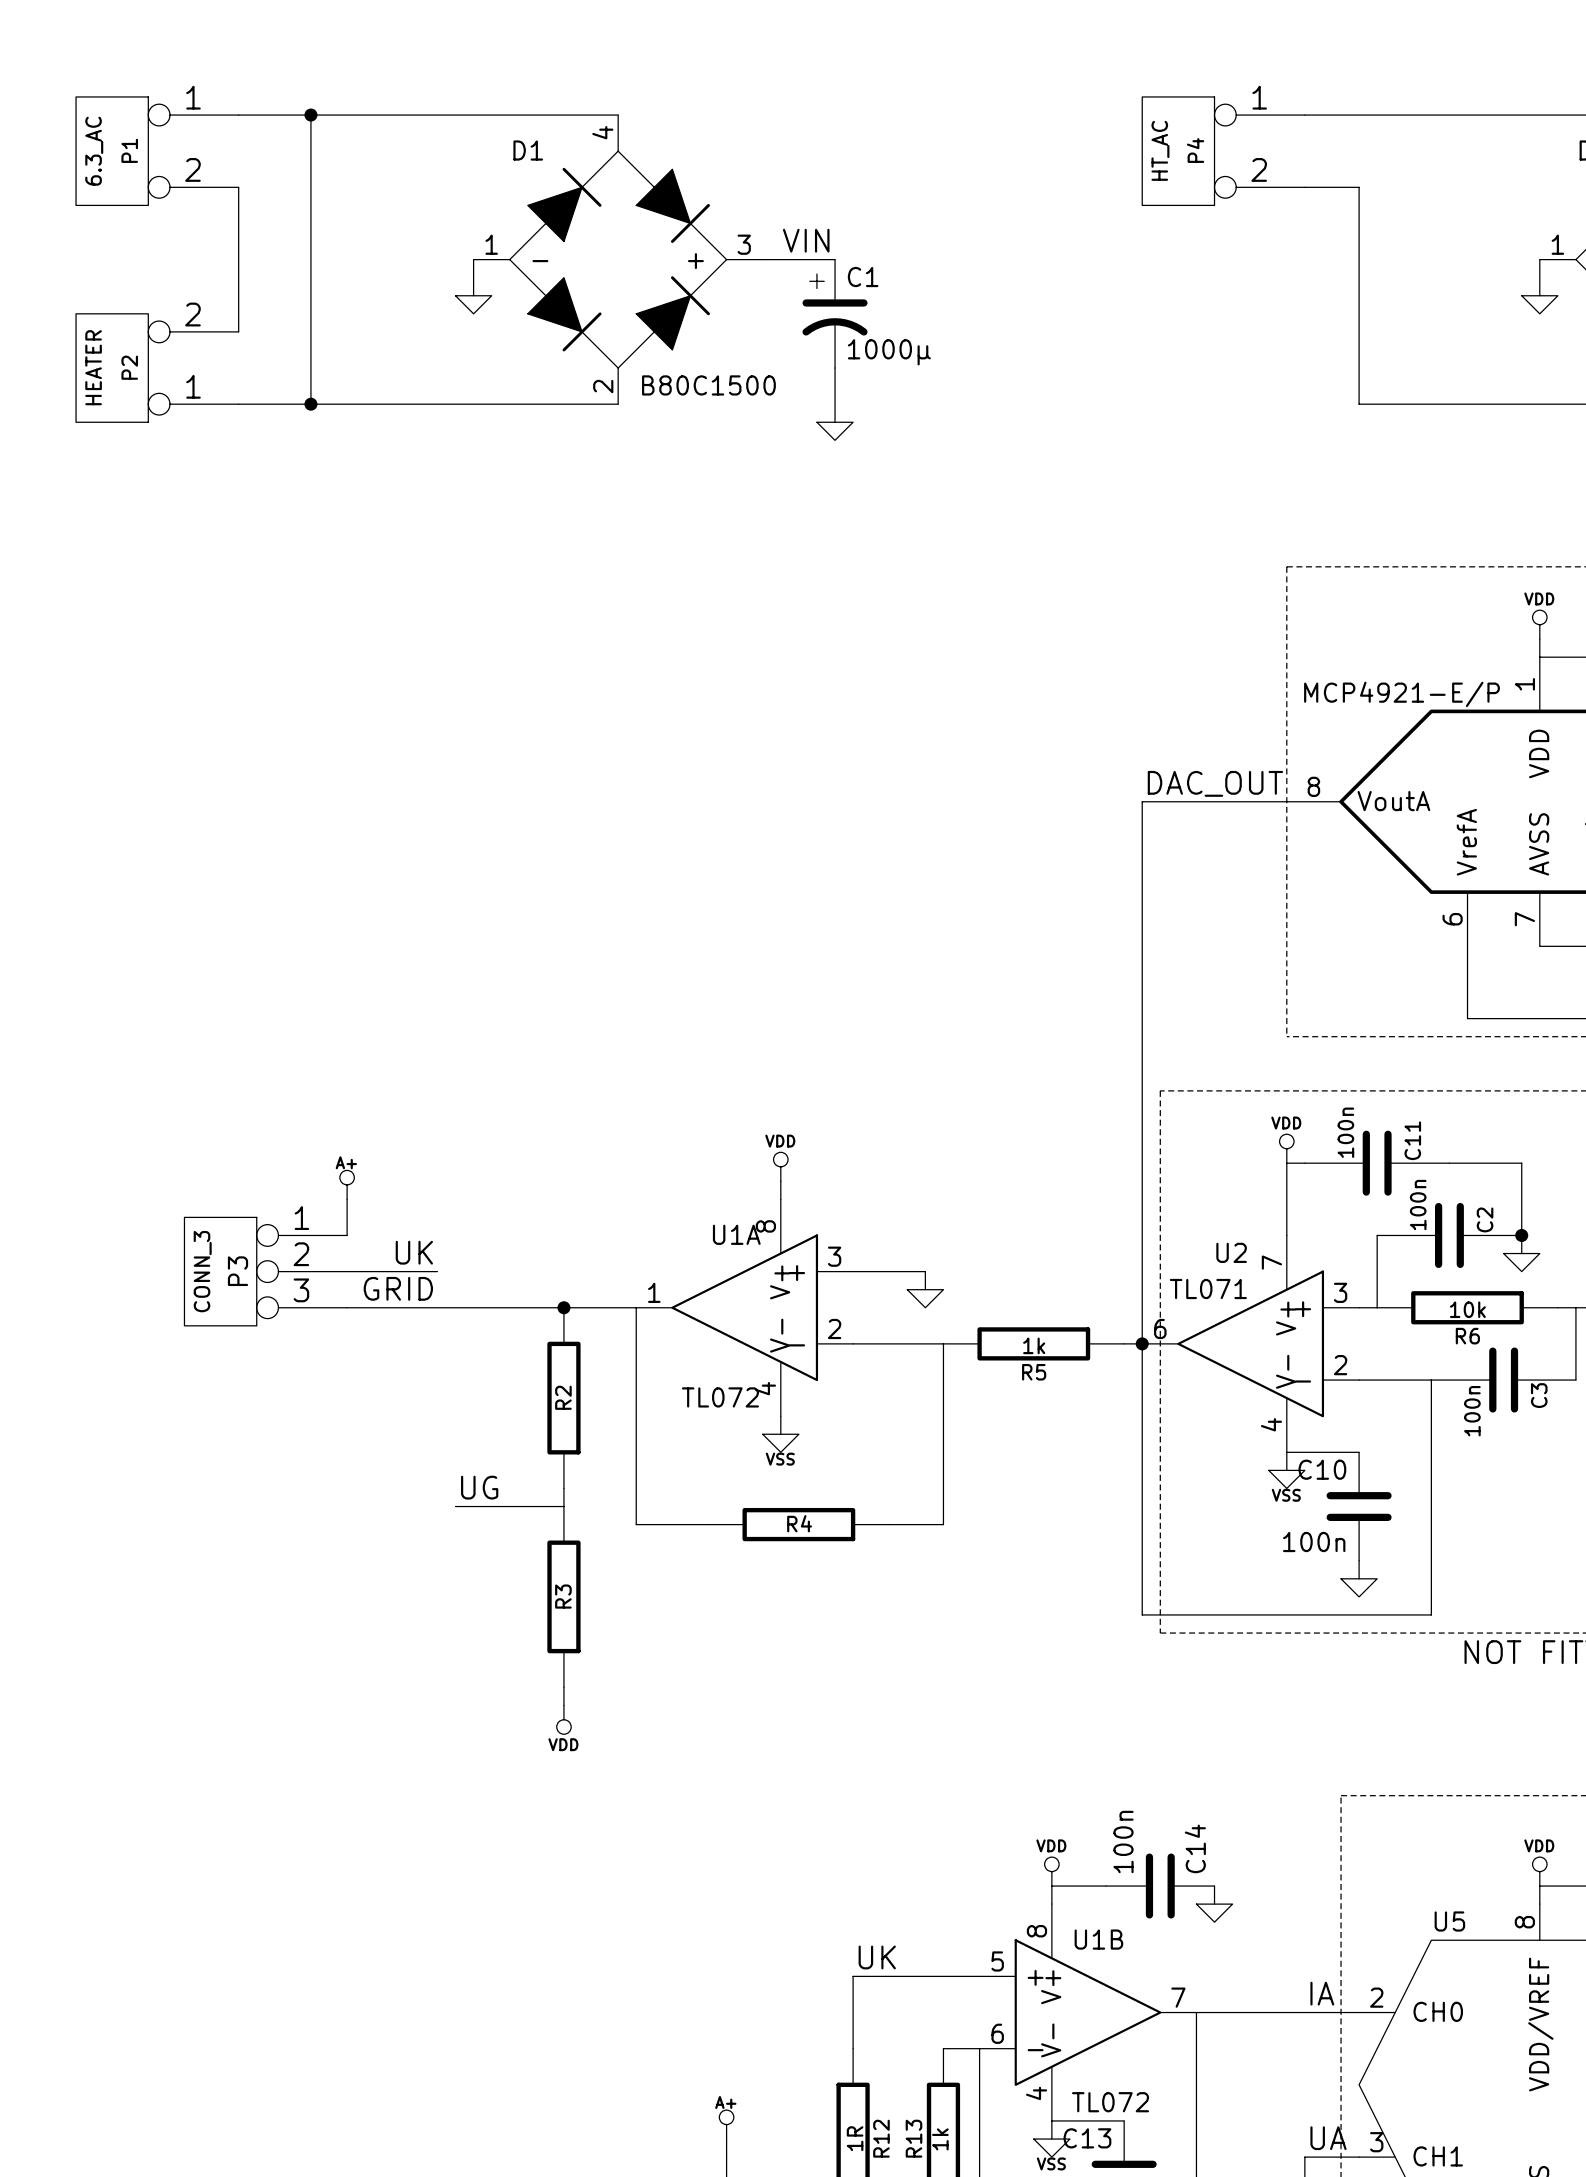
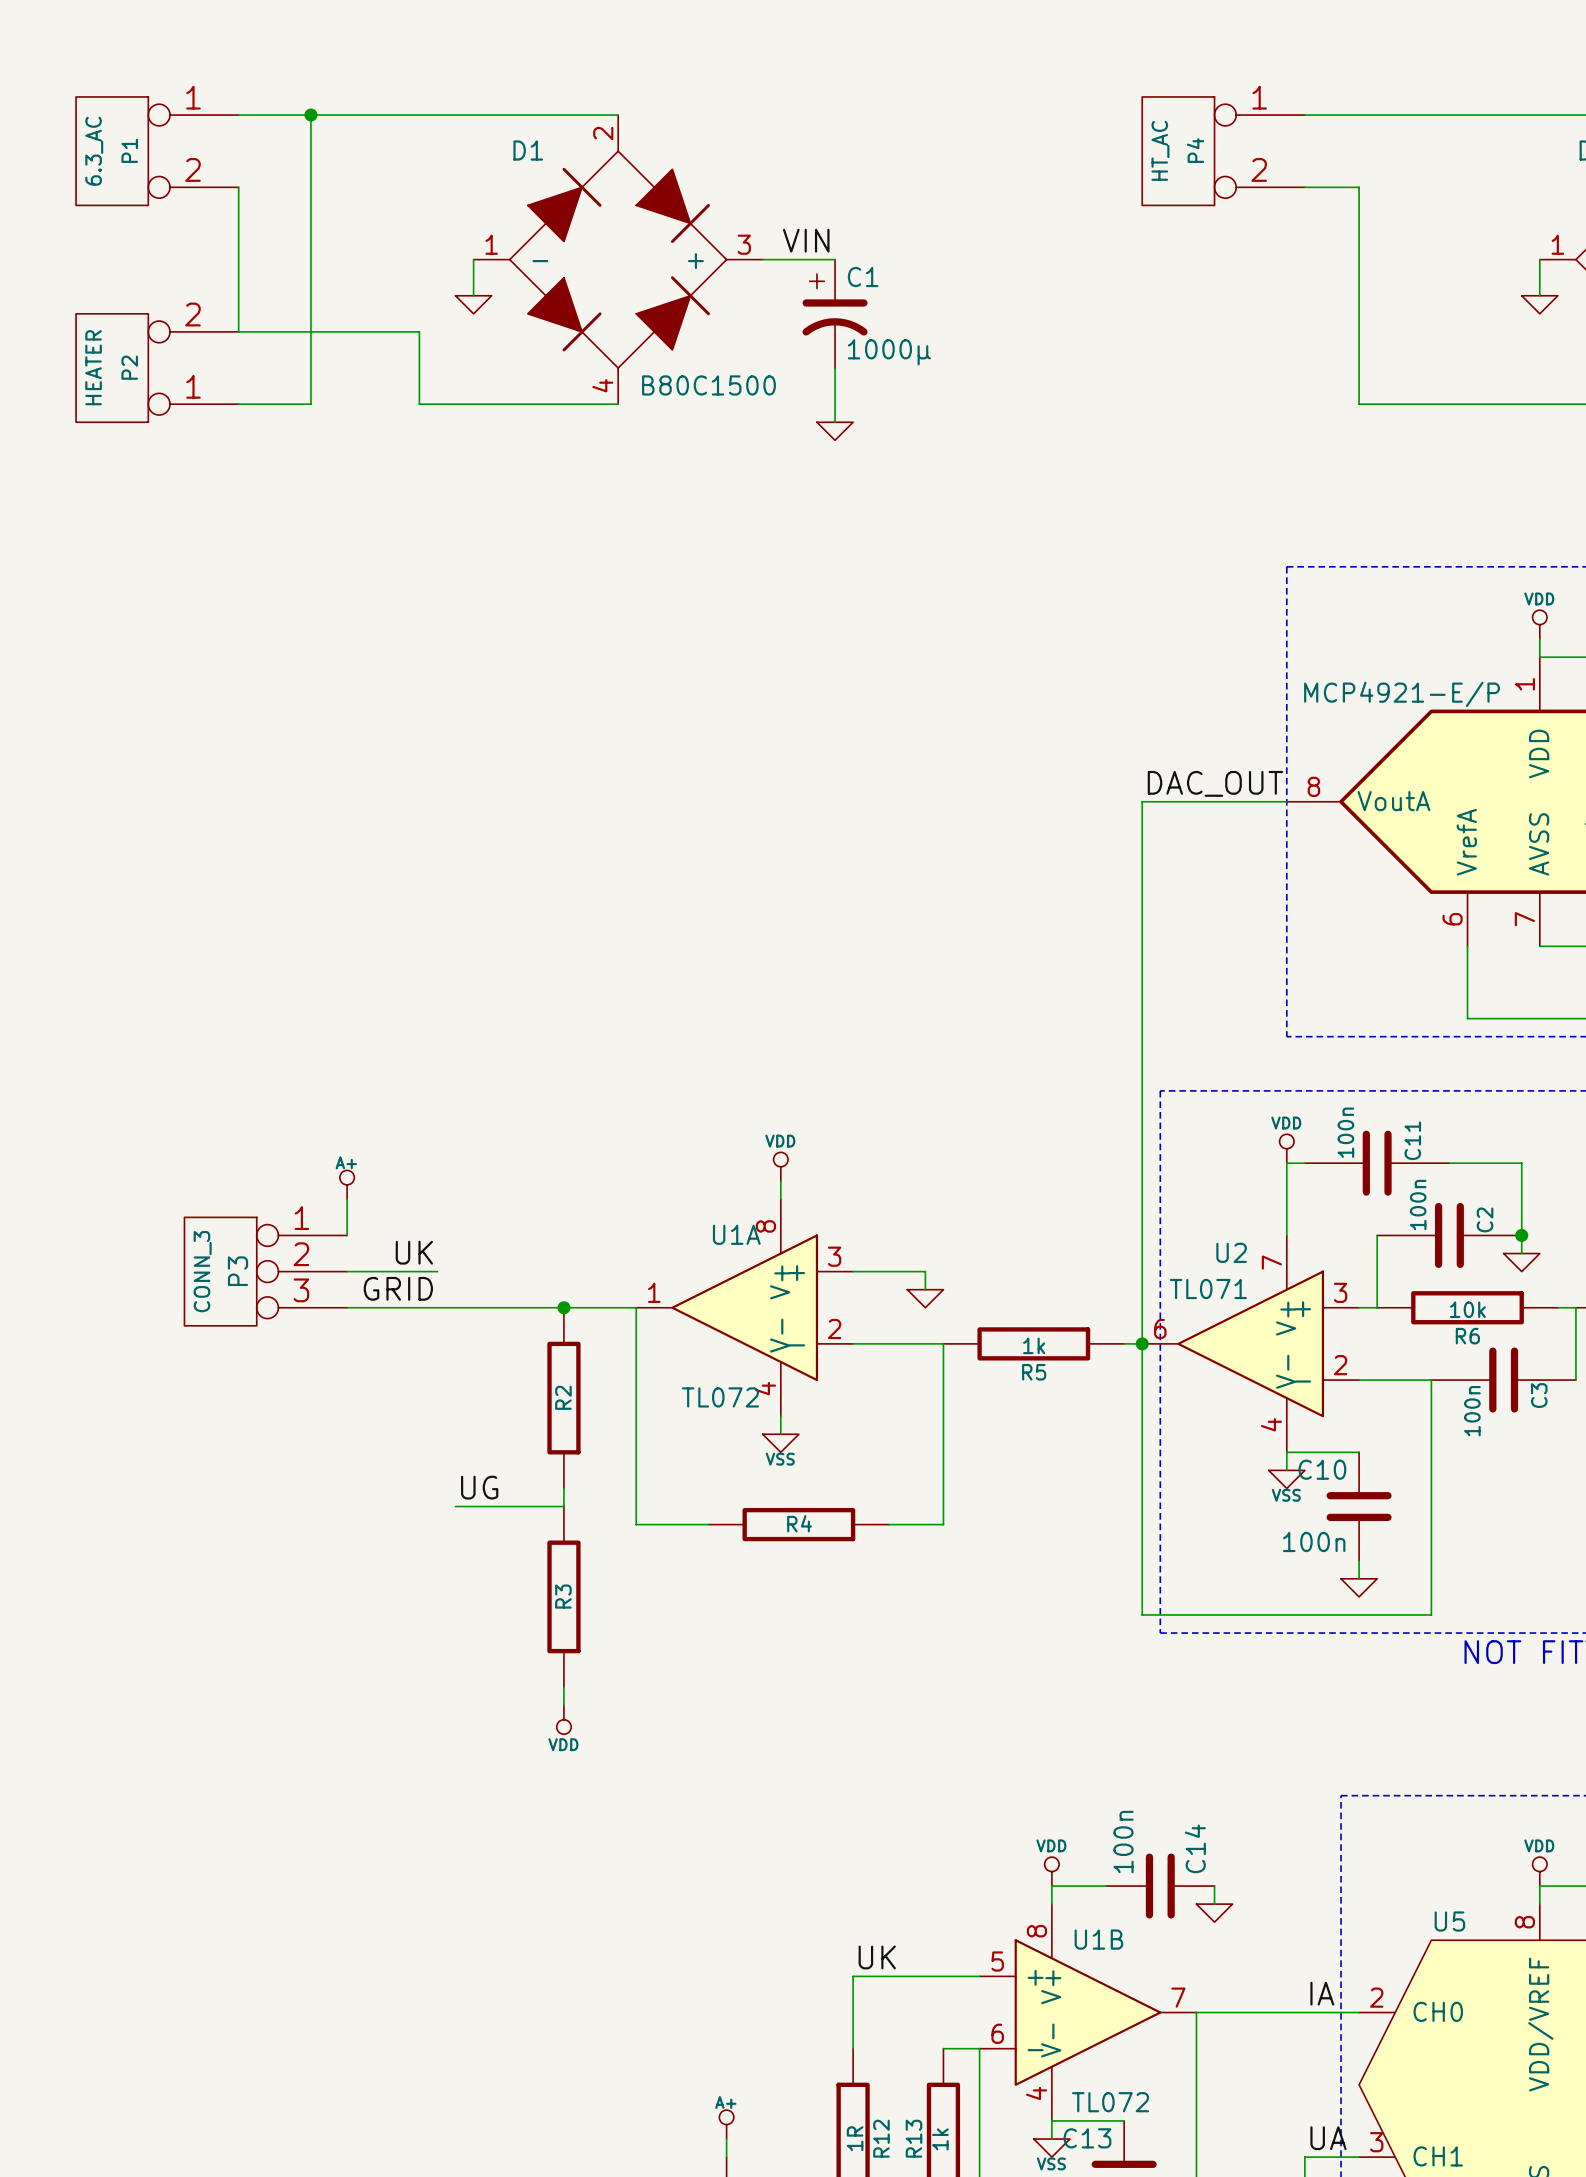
D1 flip: as is (618, 259) -> up-down (618, 259)
wire: (310, 404) (419, 404) -> (238, 331) (419, 331) (419, 404)
junction: (310, 404) -> none

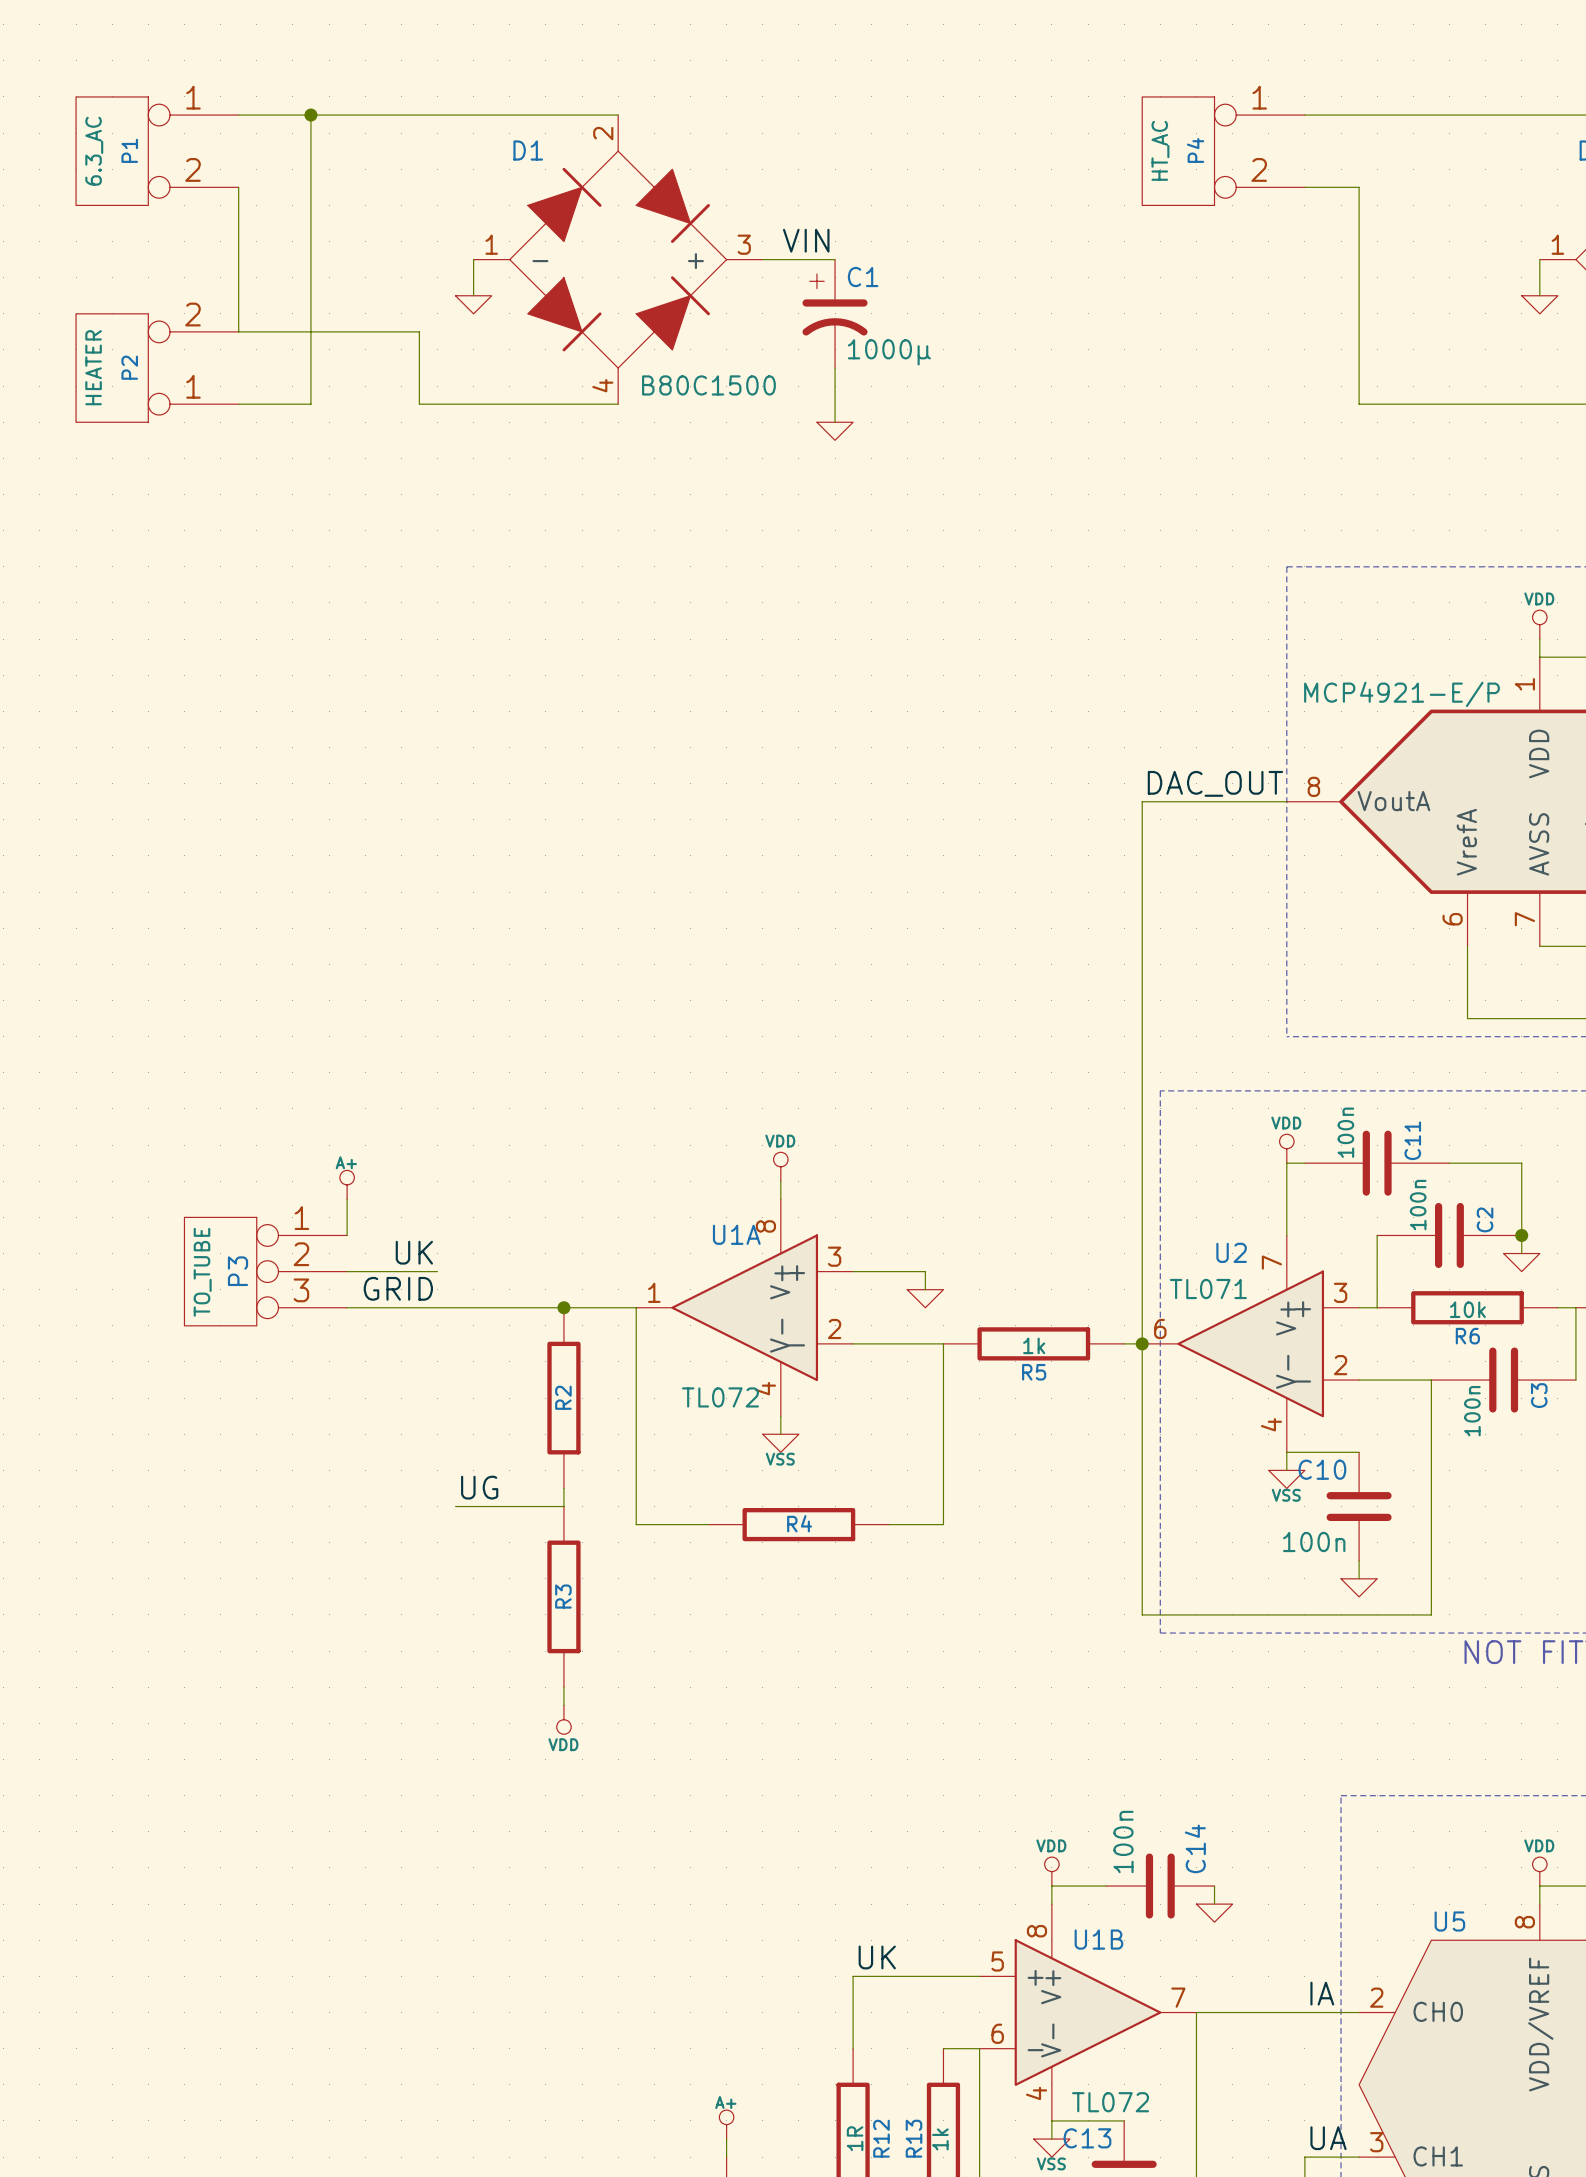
P3 value: CONN_3 (202, 1271) -> TO_TUBE (202, 1272)

